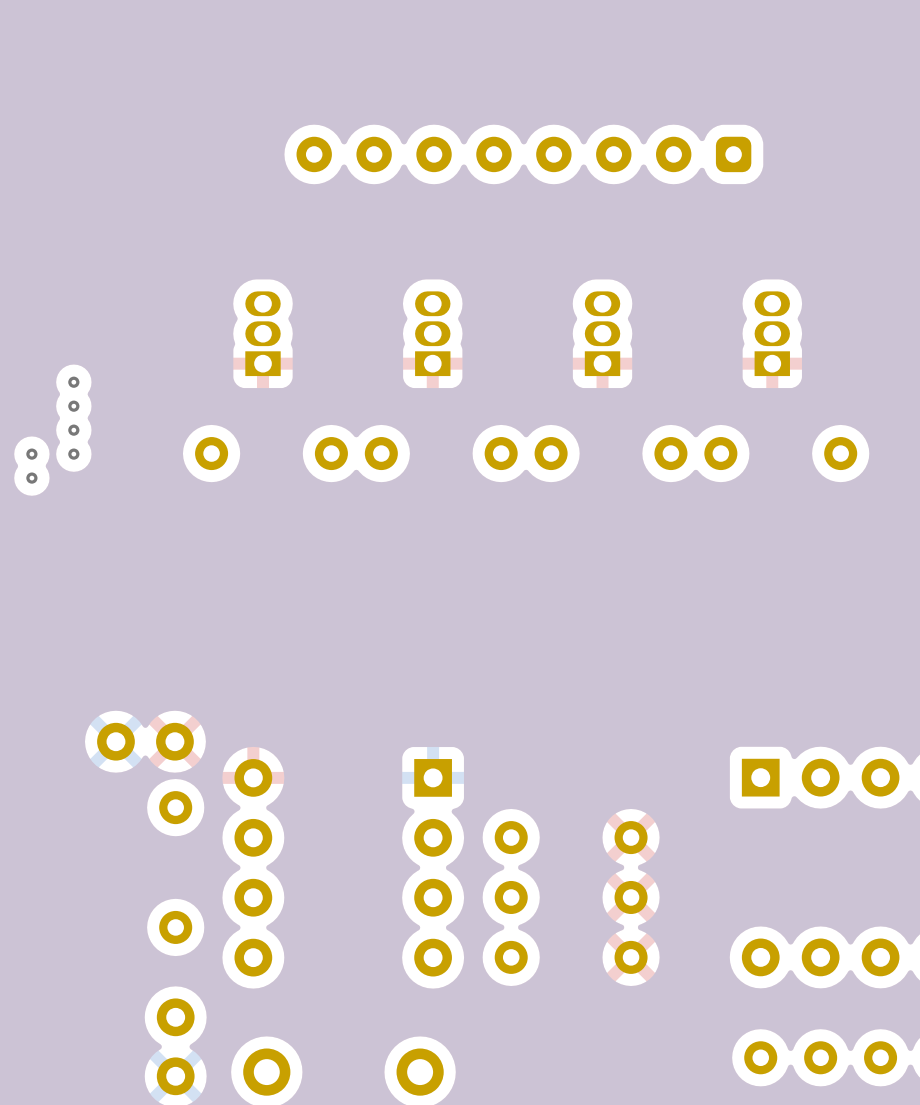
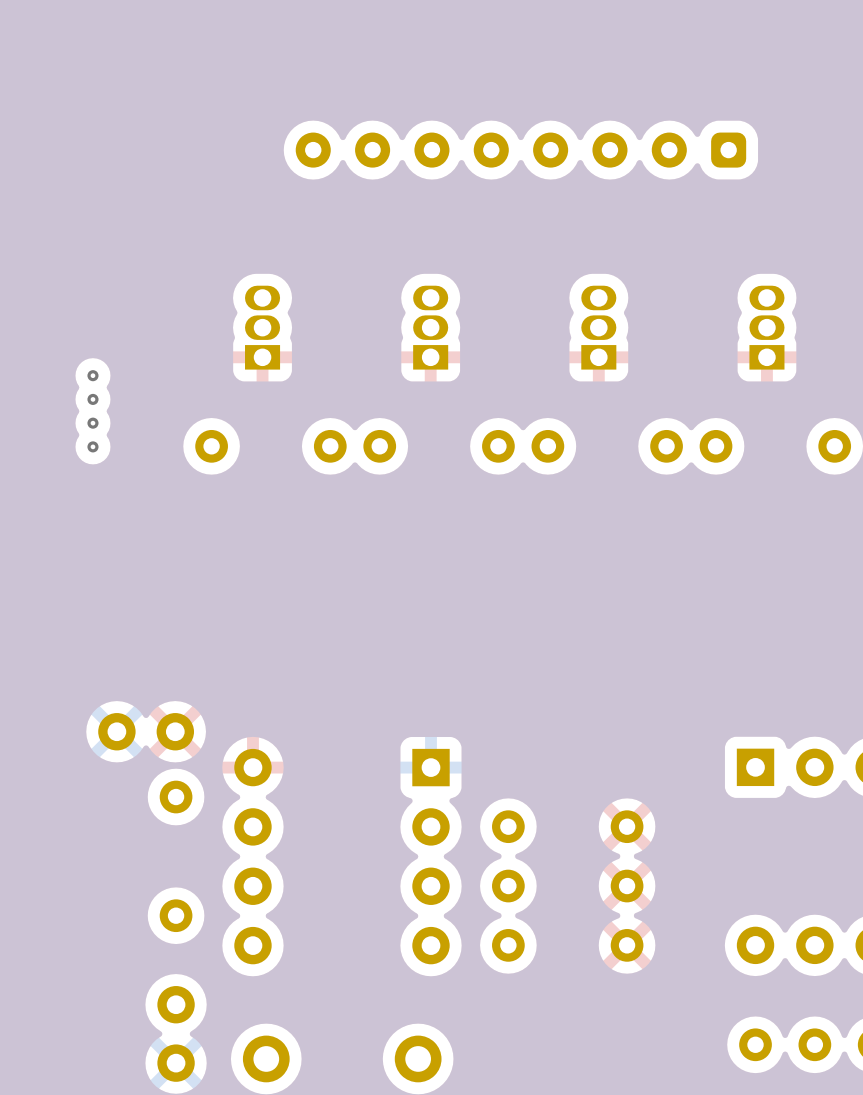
via: (73, 382) -> none
via: none -> (92, 375)
via: (73, 406) -> none
via: none -> (92, 399)
via: (73, 430) -> none
via: none -> (92, 423)
via: (31, 454) -> none
via: (73, 454) -> none
via: none -> (92, 446)
via: (31, 478) -> none

